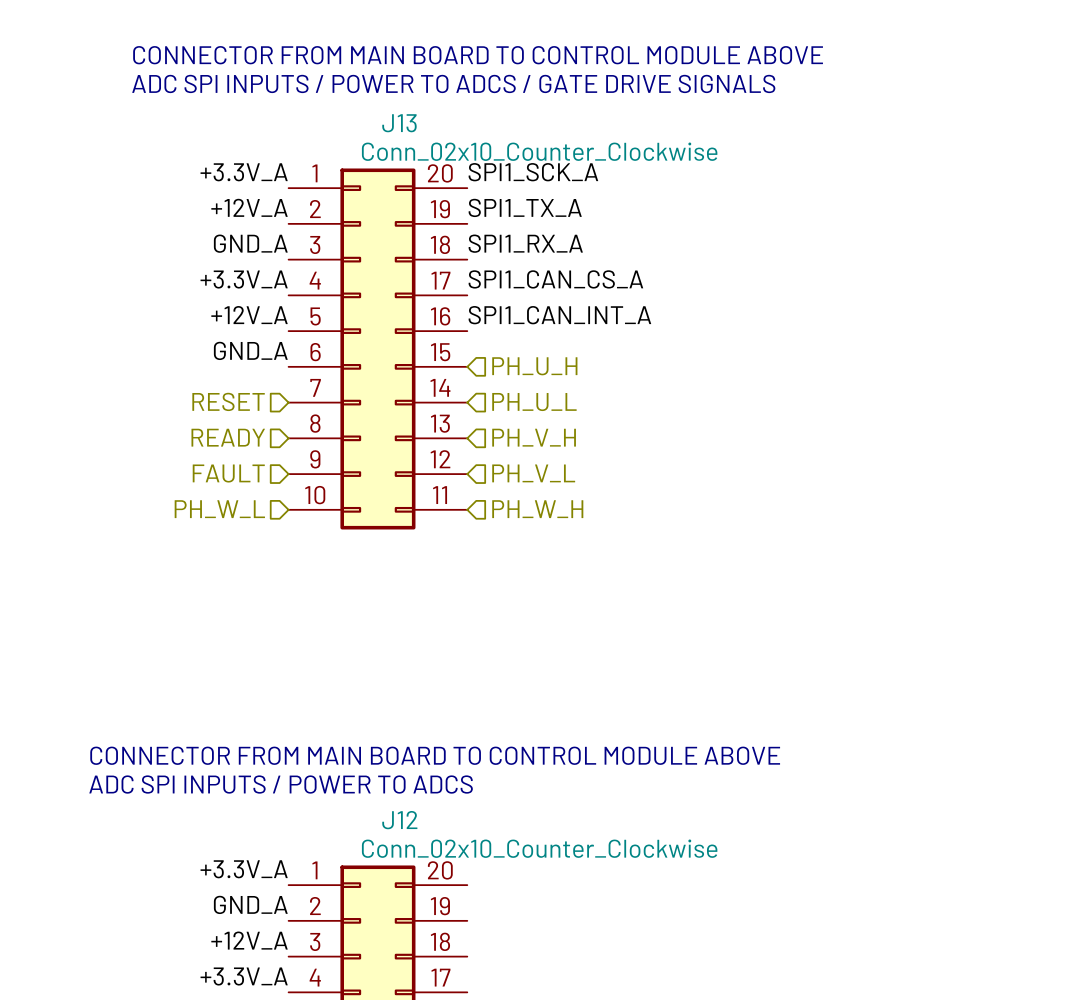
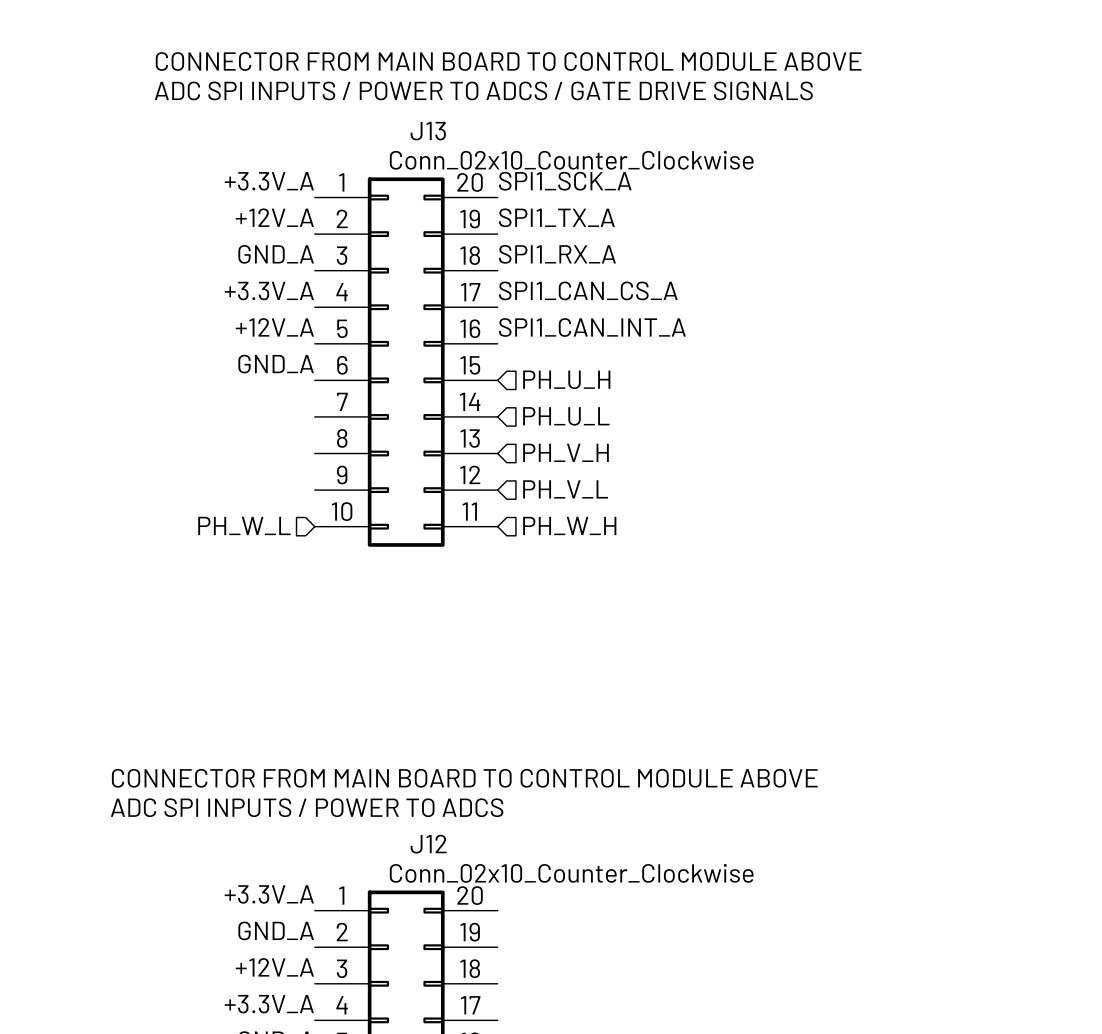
hierarchical label: RESET (228, 401) -> none
hierarchical label: READY (228, 437) -> none
hierarchical label: FAULT (228, 473) -> none

